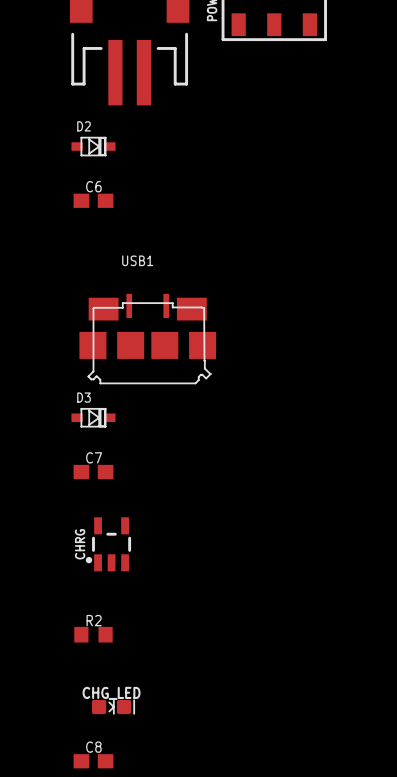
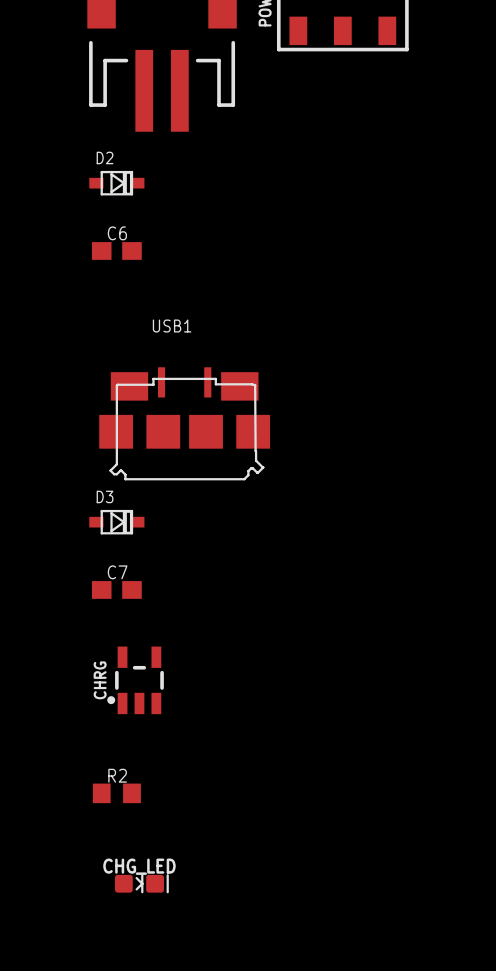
C8: (93, 761) -> none

